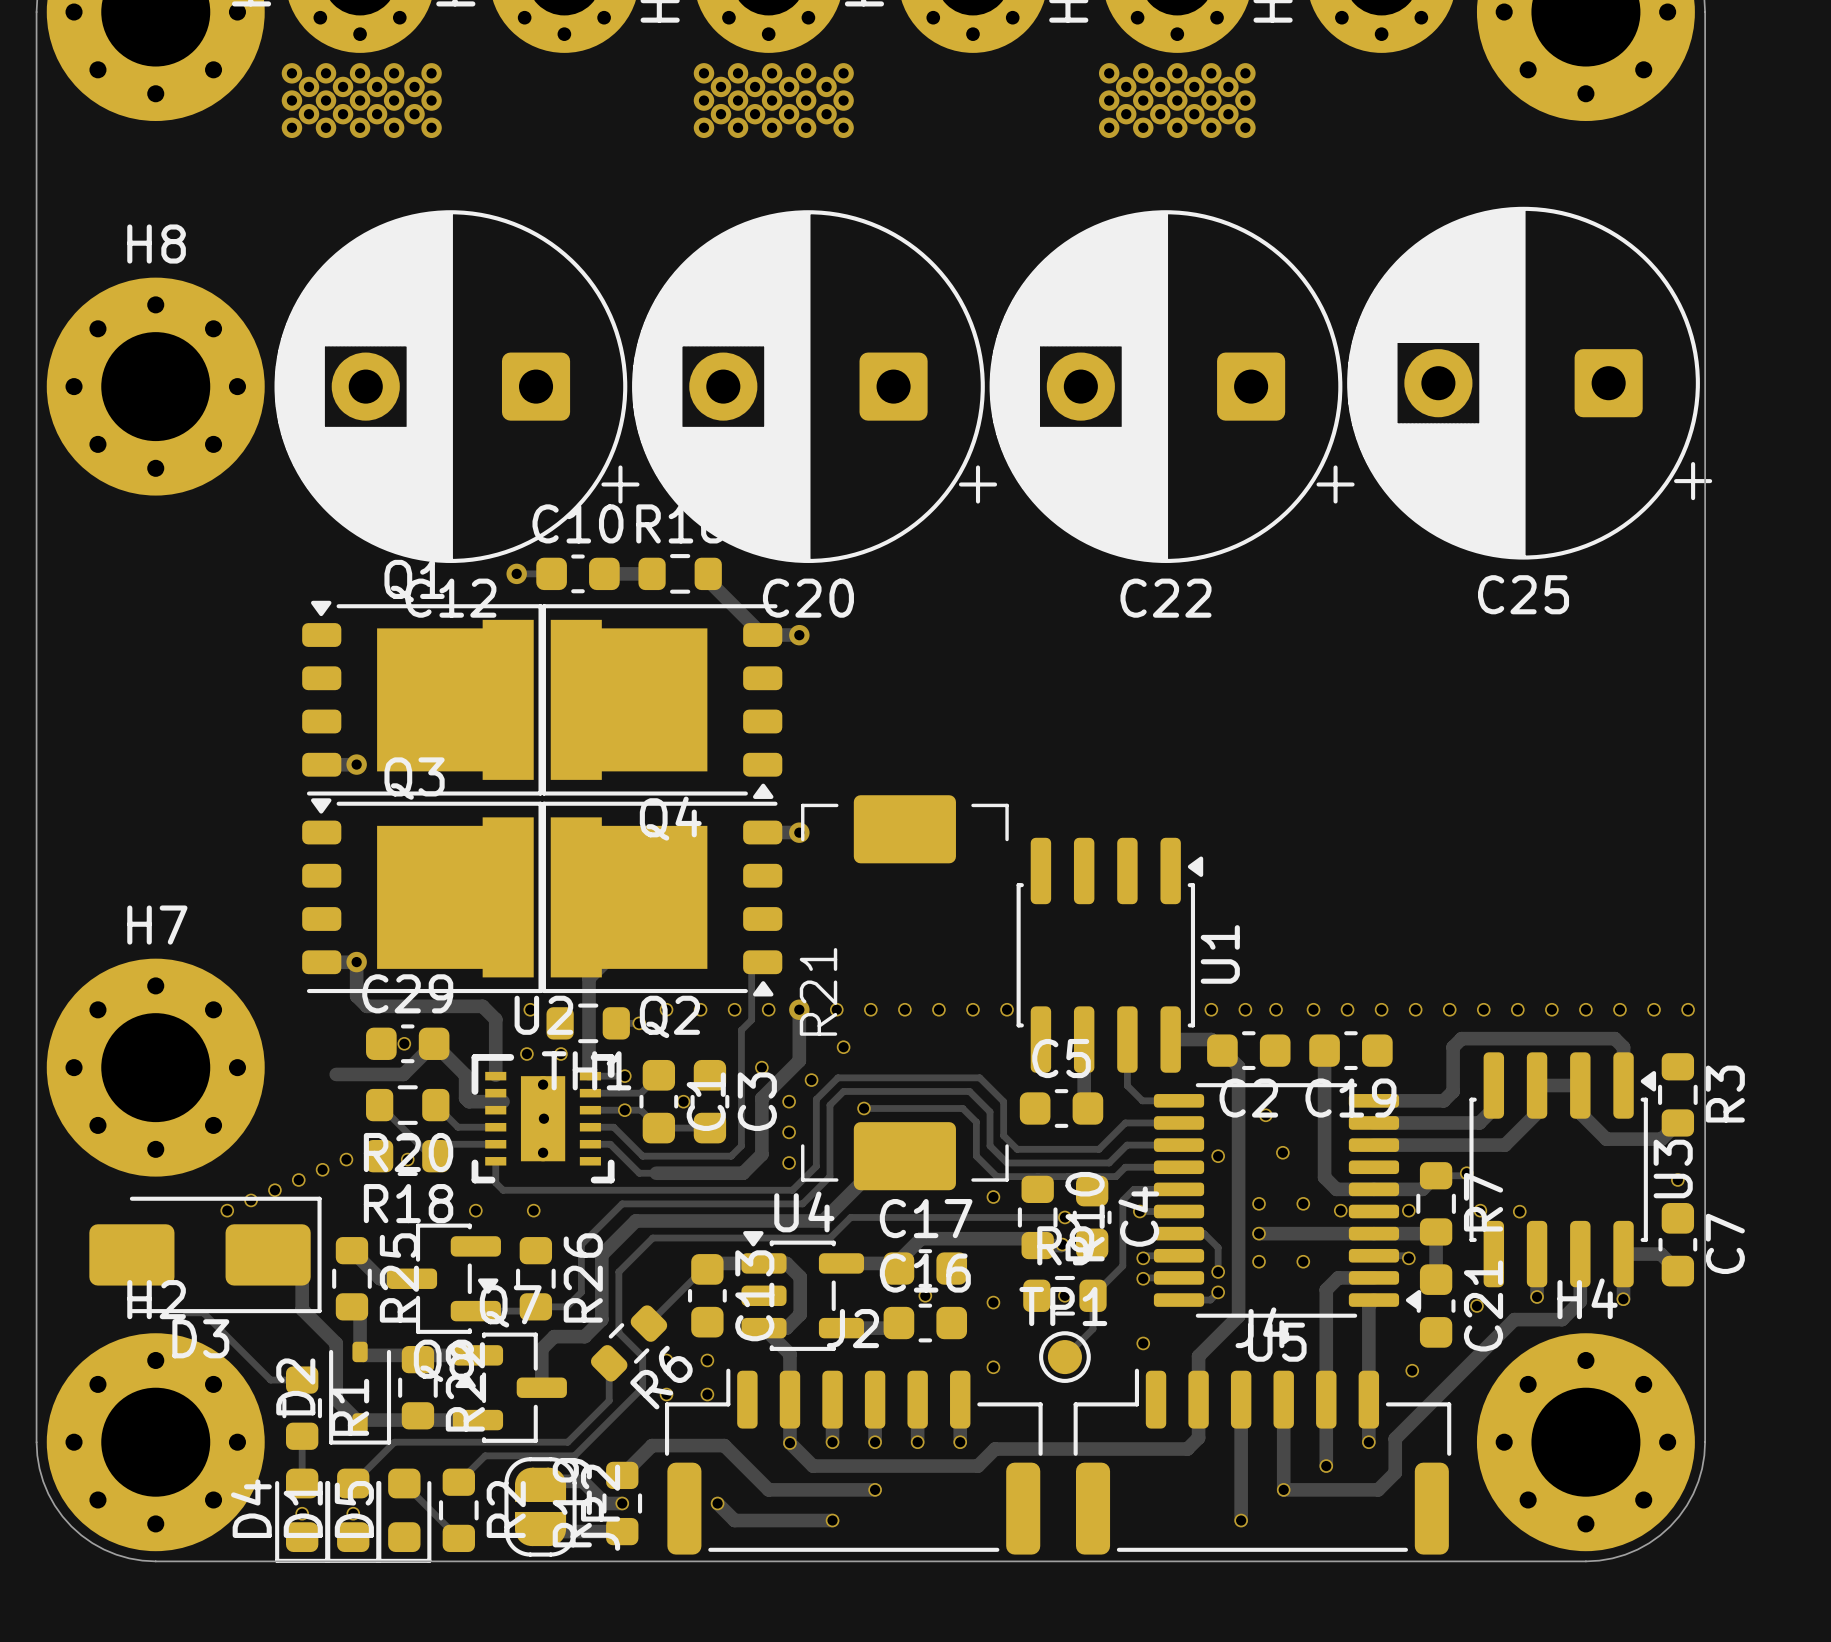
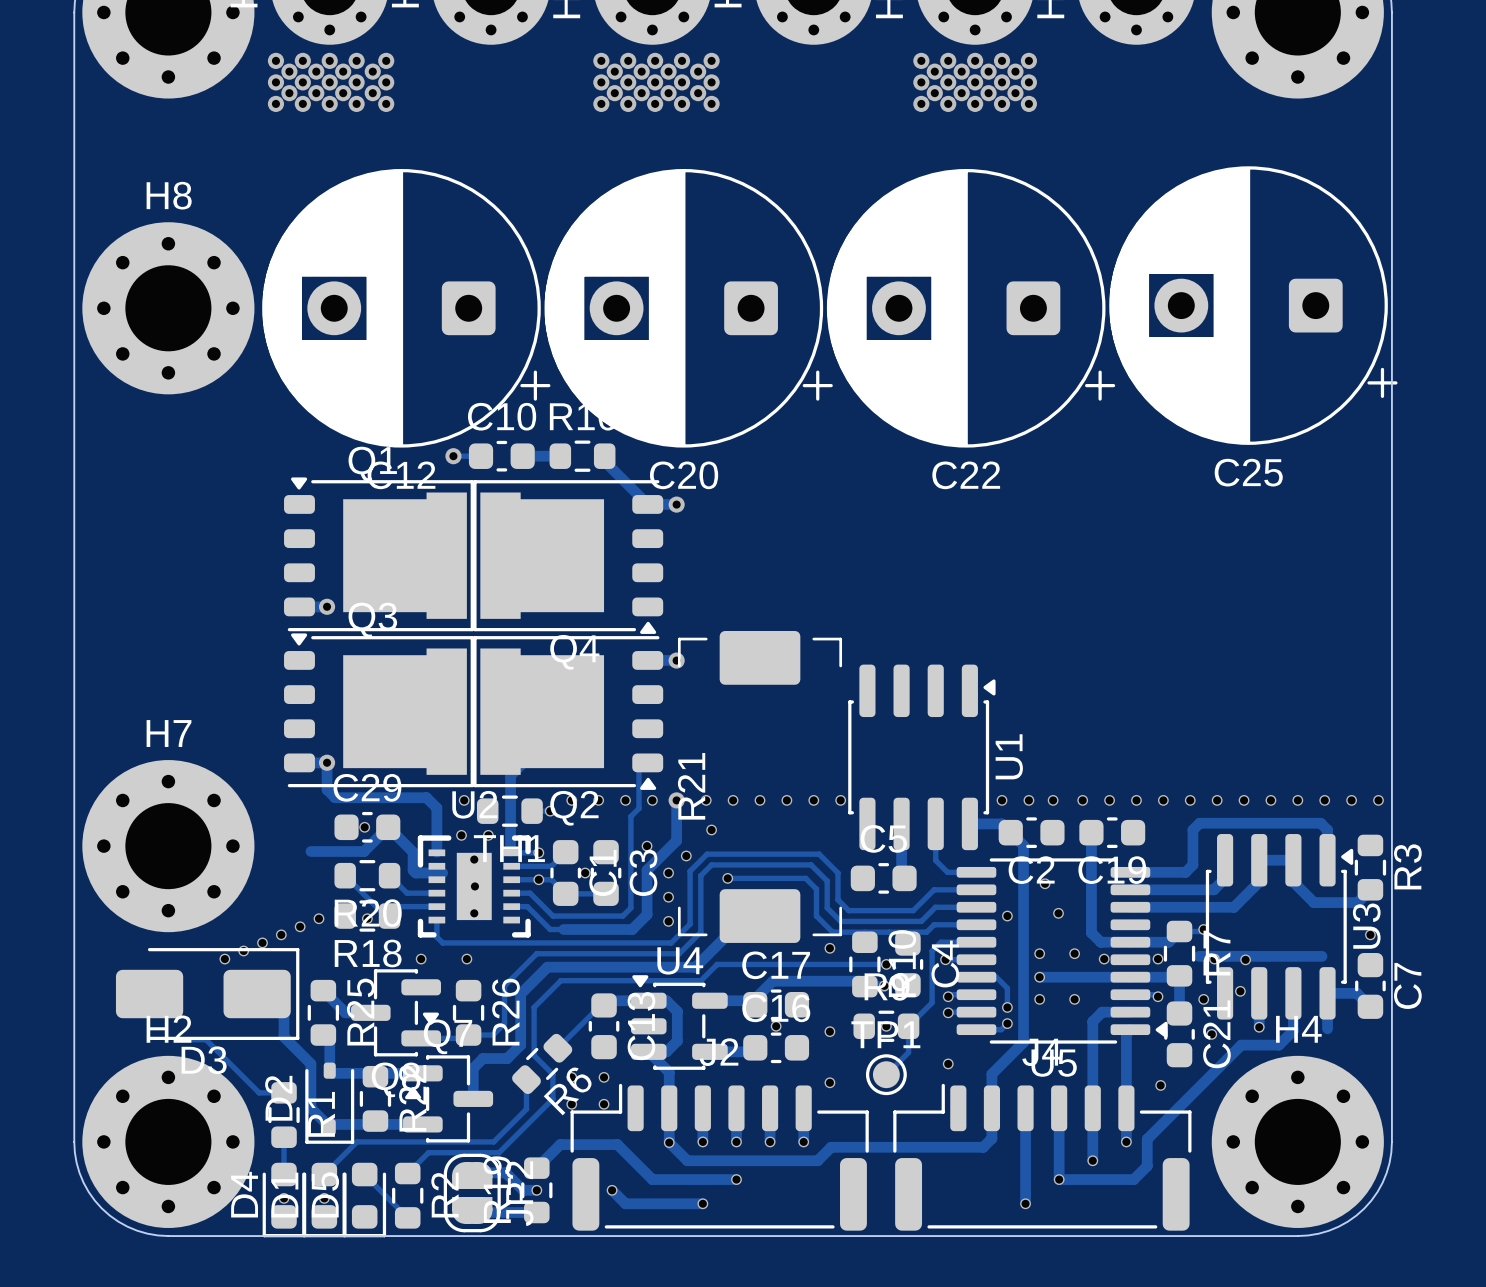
track: none -> (1199, 956) (1322, 956)
via: none -> (1240, 991)
via: none -> (1203, 999)
via: (1623, 1299) -> none

